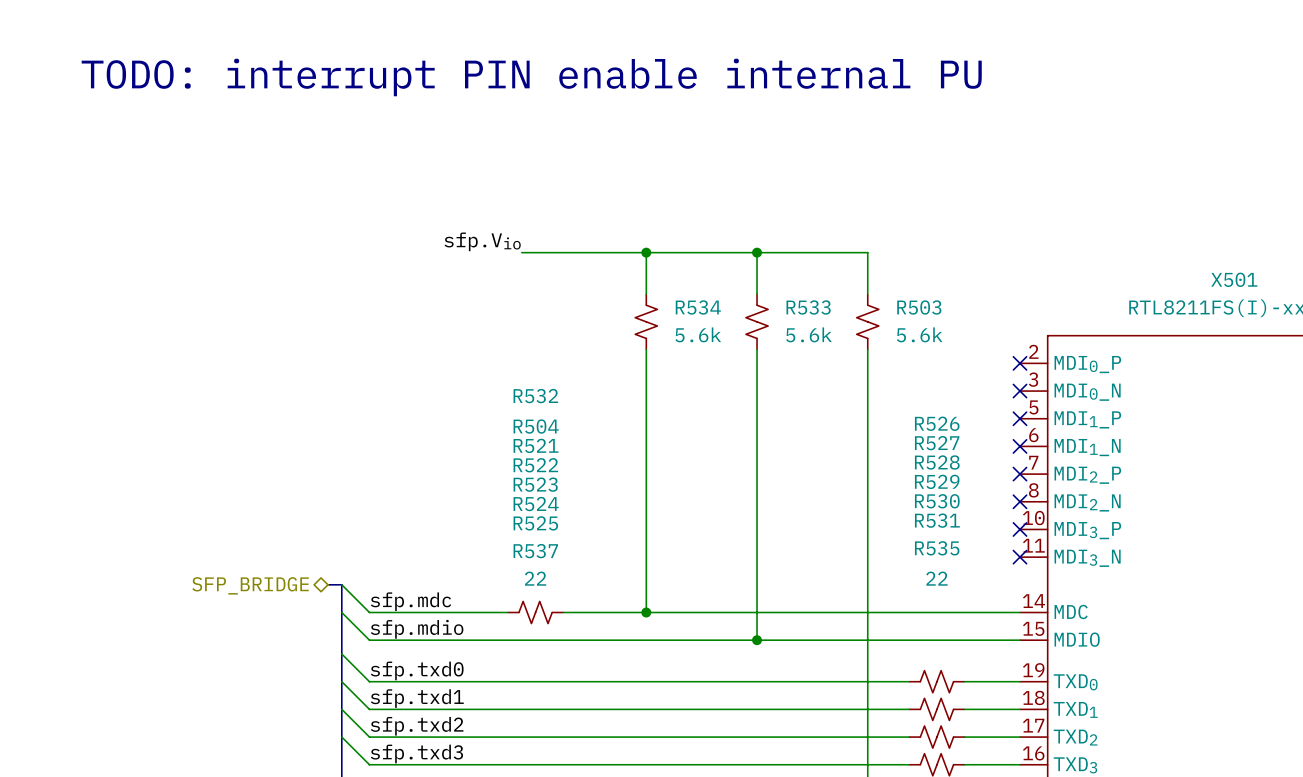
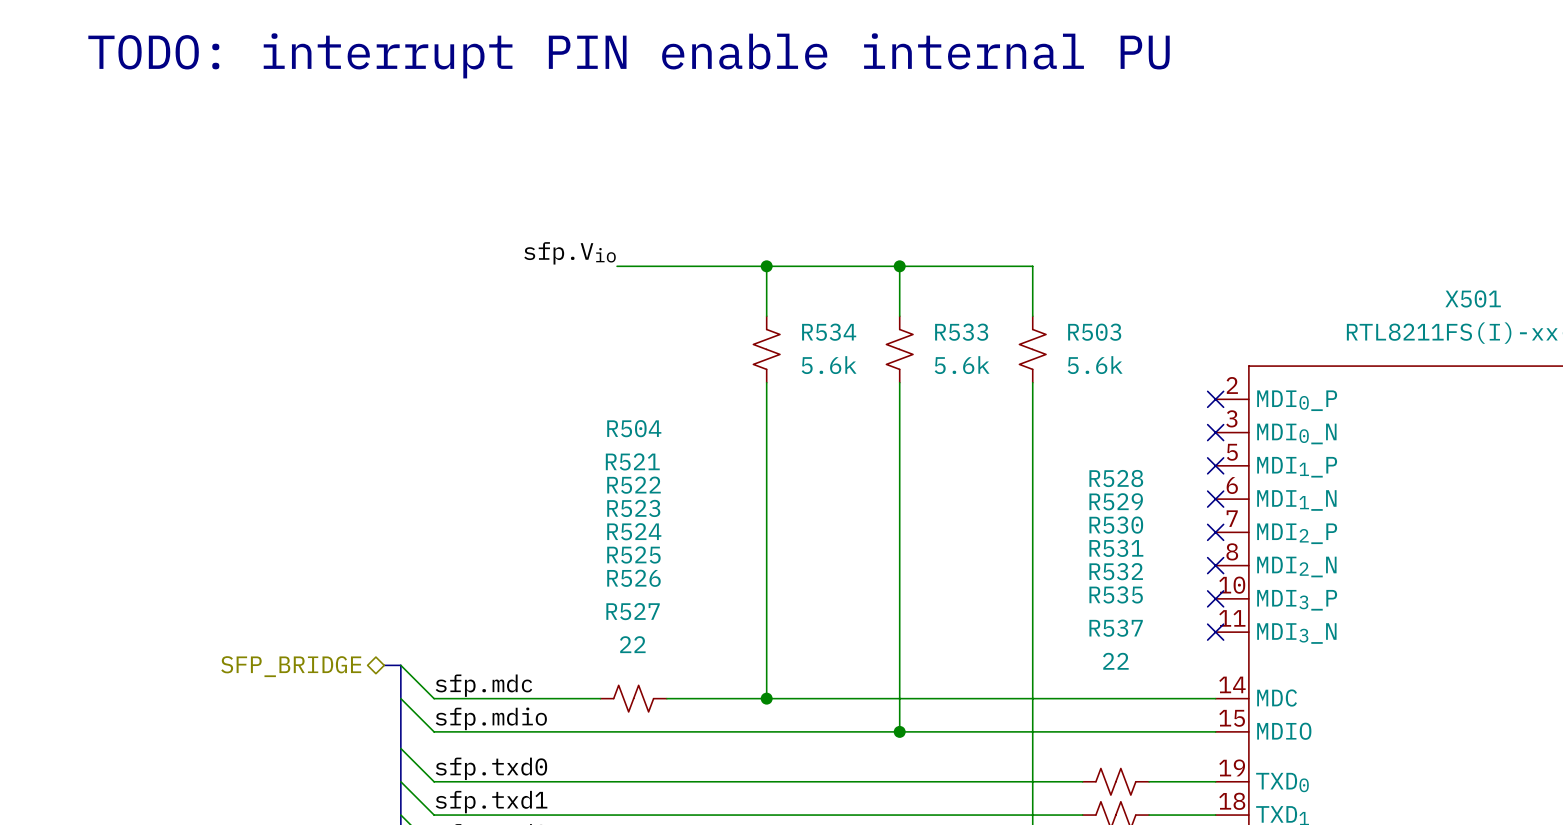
R532 name: R532 (535, 396) -> R504 (634, 428)
R526 name: R526 (937, 423) -> R528 (1116, 478)
R504 name: R504 (536, 426) -> R521 (632, 461)
R527 name: R527 (937, 443) -> R529 (1116, 501)
R521 name: R521 (536, 445) -> R522 (633, 485)
R528 name: R528 (937, 462) -> R530 (1116, 525)
R522 name: R522 (535, 465) -> R523 (633, 508)
R529 name: R529 (937, 481) -> R531 (1116, 548)
R523 name: R523 (535, 484) -> R524 (634, 531)
R530 name: R530 (937, 501) -> R532 (1116, 571)
R524 name: R524 (536, 504) -> R525 (633, 555)
R531 name: R531 (937, 520) -> R535 (1116, 594)
R525 name: R525 (535, 523) -> R526 (633, 578)
R535 name: R535 (937, 548) -> R537 (1116, 628)
R537 name: R537 (535, 551) -> R527 (633, 611)
R537 value: none -> 22 (632, 644)
R504 value: 22 (535, 578) -> none
R526 value: 22 (936, 578) -> none
R535 value: none -> 22 (1115, 661)

